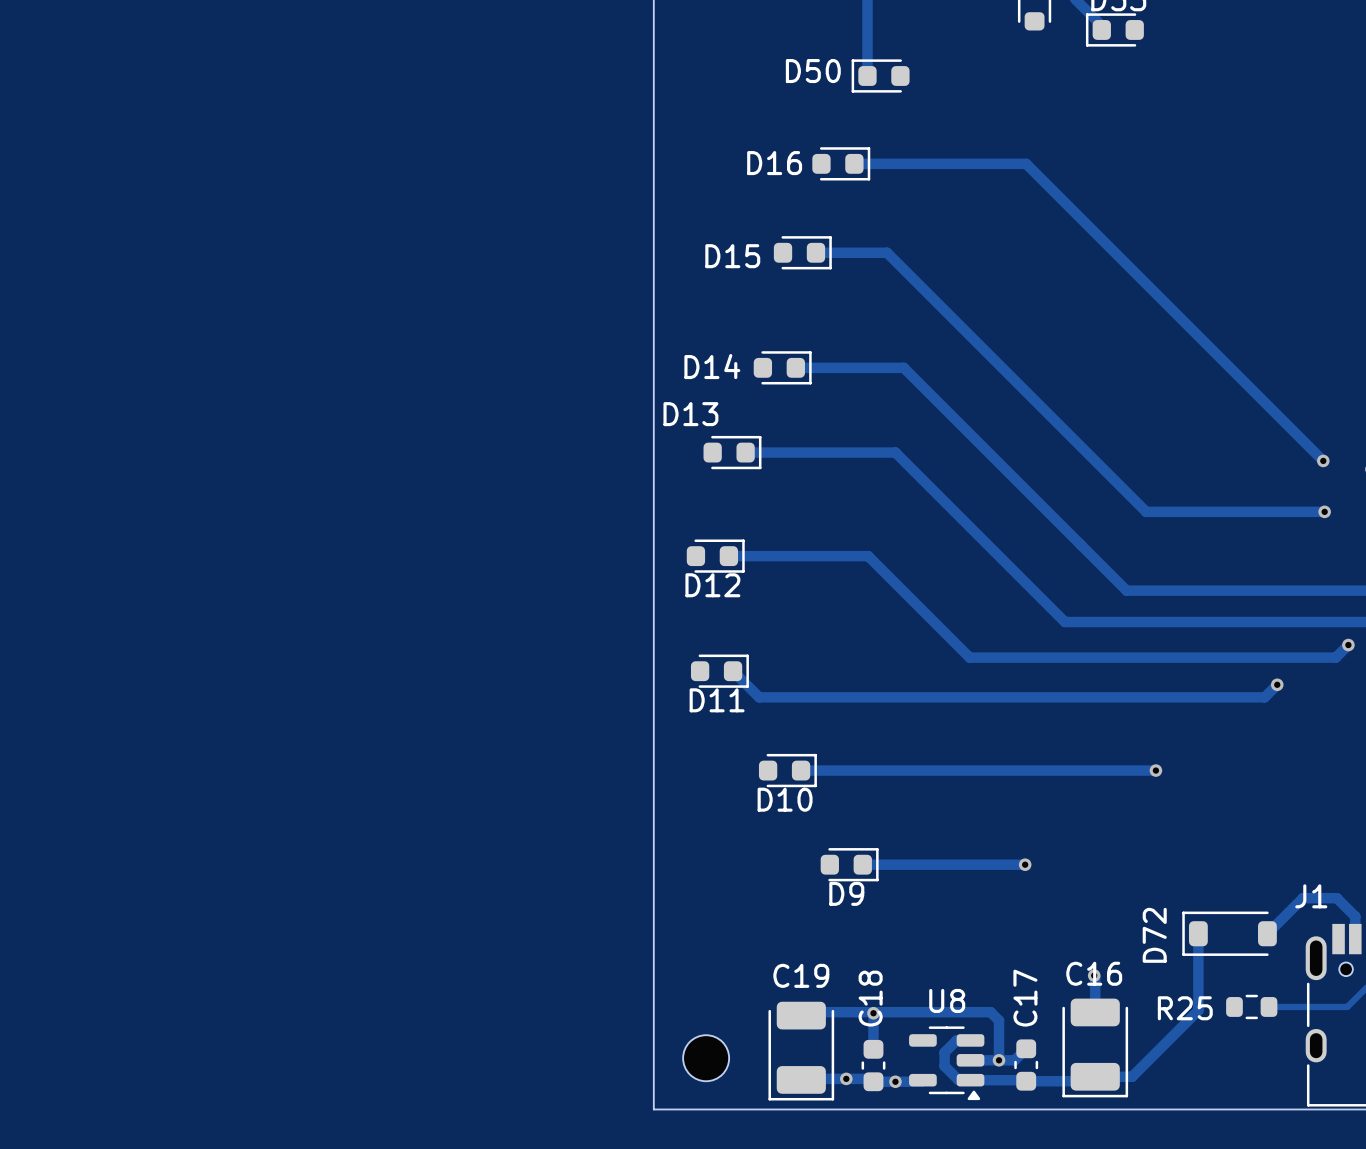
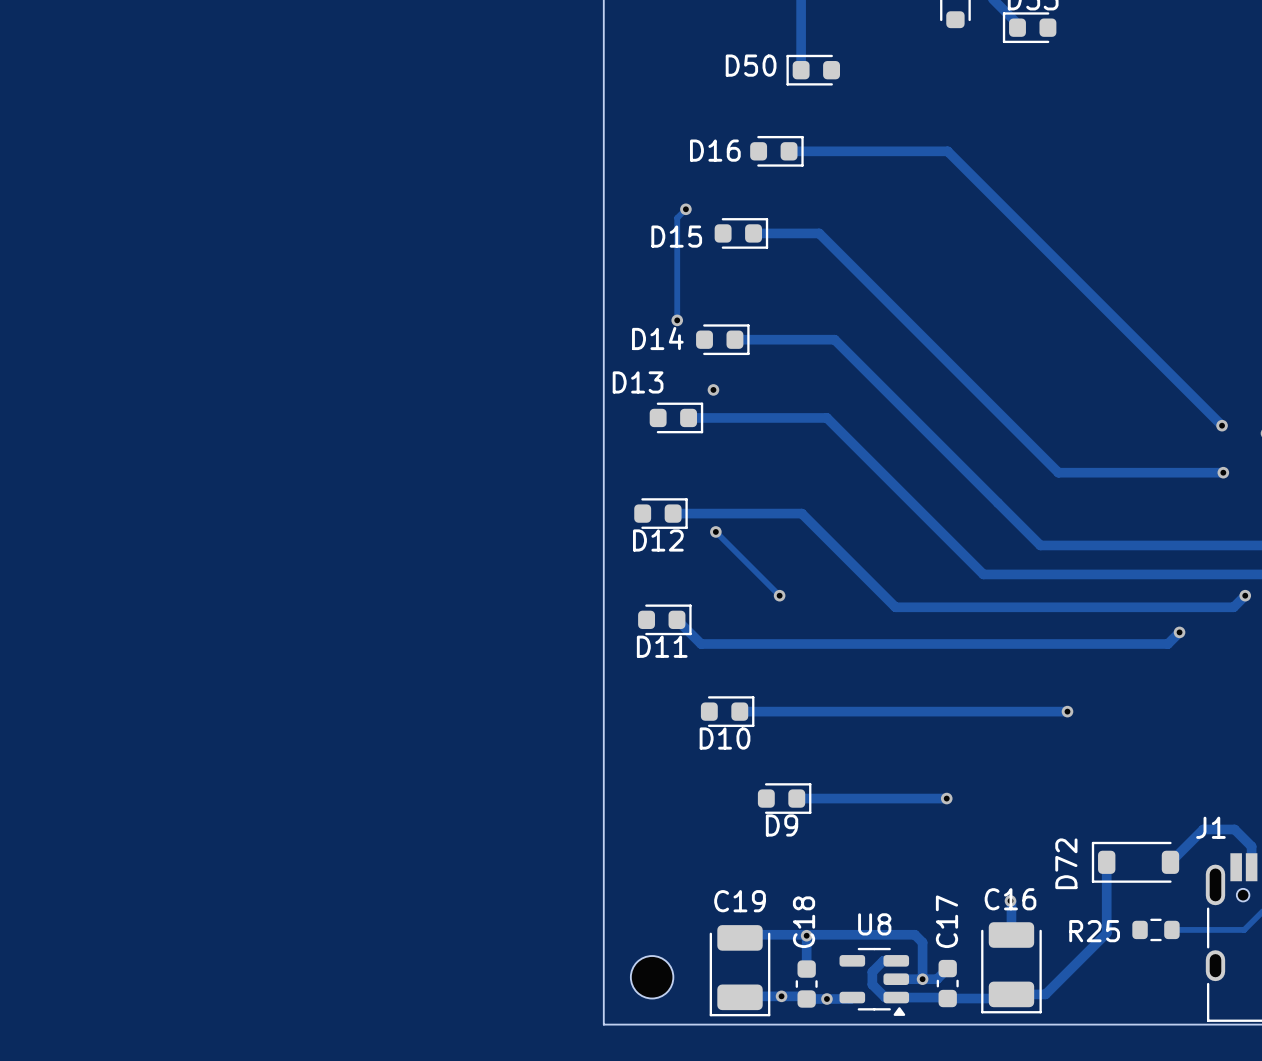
track: none -> (685, 209) (677, 217) (677, 320)
via: none -> (685, 209)
via: none -> (677, 320)
via: none -> (713, 389)
track: none -> (715, 531) (779, 595)
via: none -> (715, 531)
via: none -> (779, 595)

